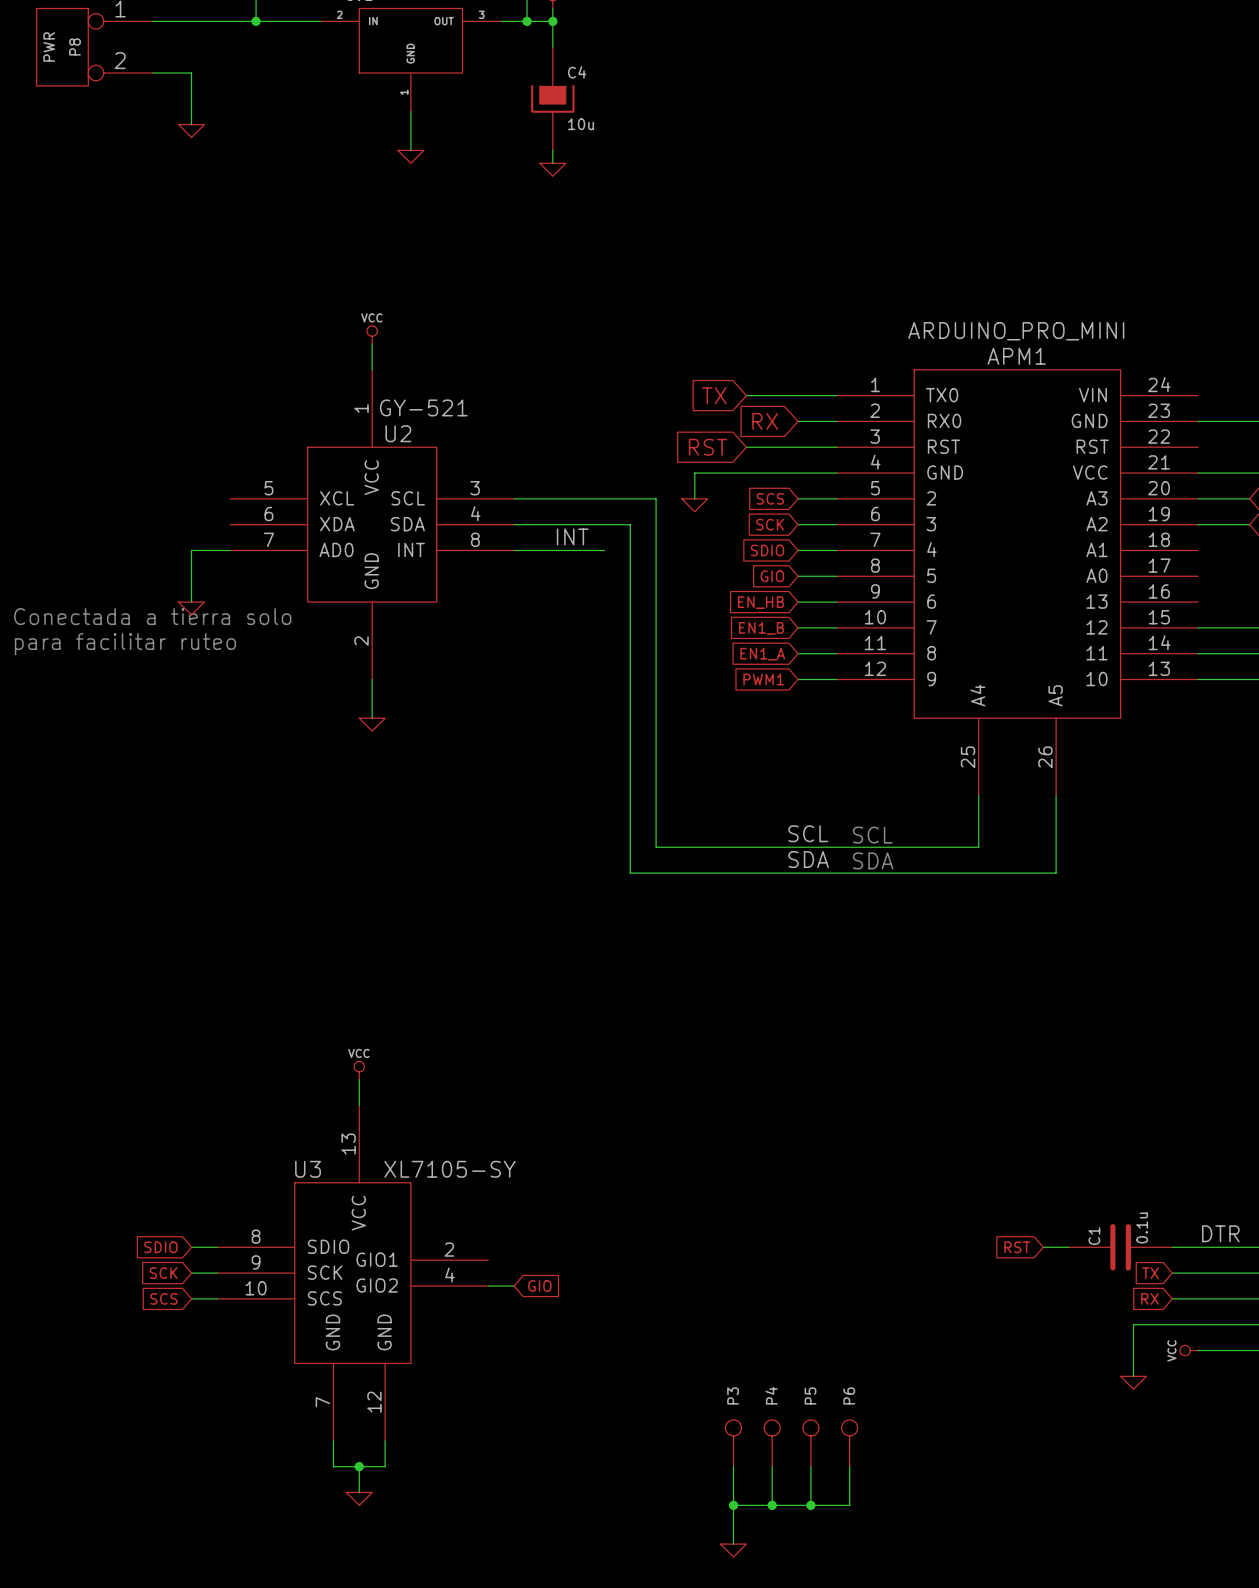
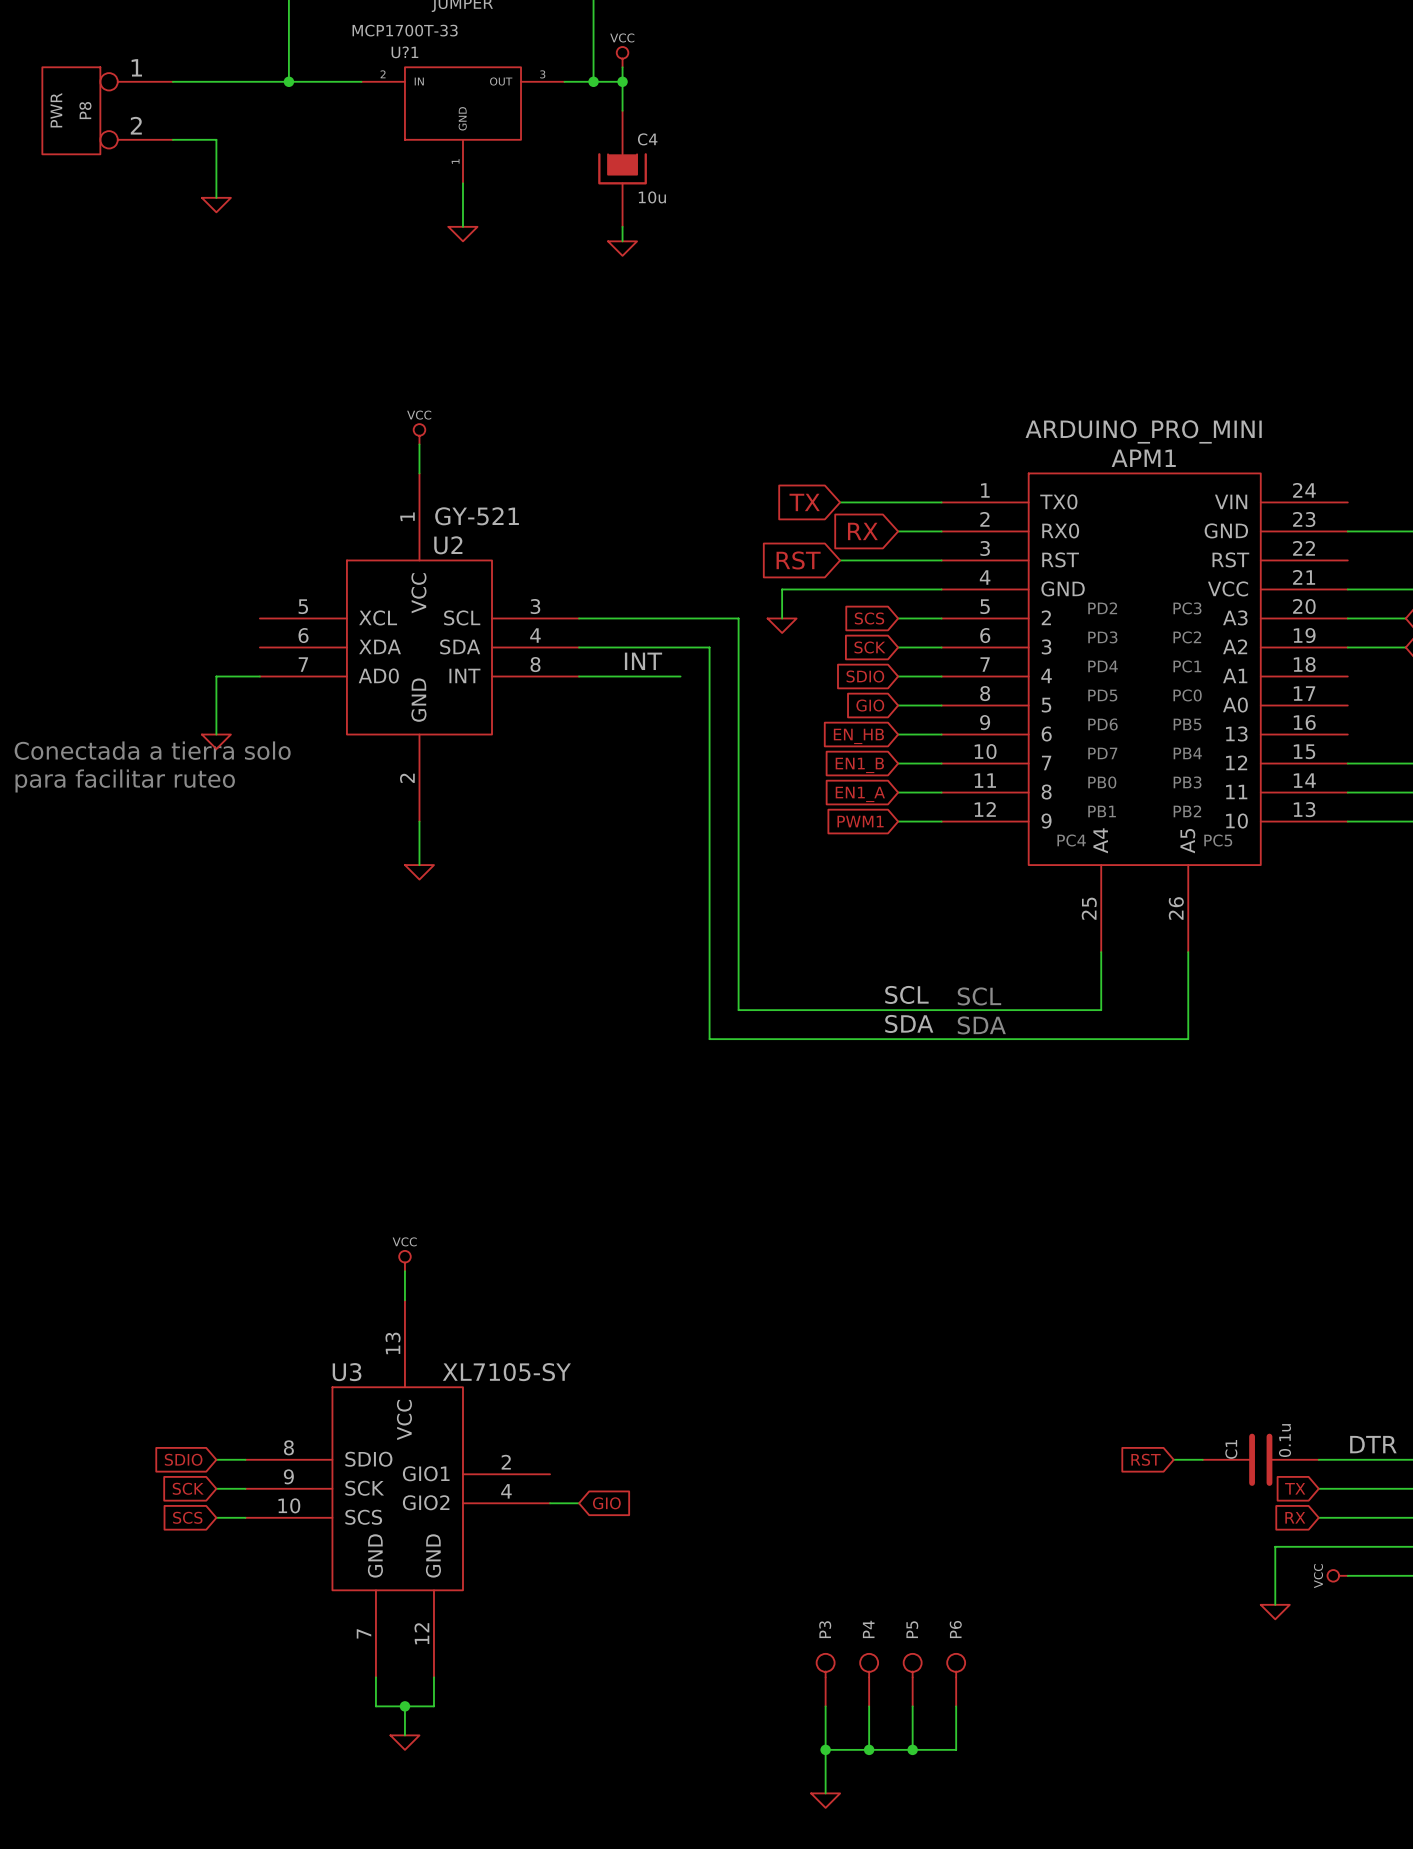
text: none -> PD2 (1102, 608)
text: none -> PC3 (1187, 608)
text: none -> PD3 (1102, 637)
text: none -> PC2 (1187, 637)
text: none -> PD4 (1103, 666)
text: none -> PC1 (1187, 666)
text: none -> PD5 (1102, 695)
text: none -> PC0 (1187, 695)
text: none -> PD6 (1102, 724)
text: none -> PB5 (1187, 724)
text: none -> PD7 (1102, 753)
text: none -> PB4 (1187, 753)
text: none -> PB0 (1102, 782)
text: none -> PB3 (1187, 782)
text: none -> PB1 (1102, 811)
text: none -> PB2 (1187, 811)
text: none -> PC4 (1071, 840)
text: none -> PC5 (1218, 840)

